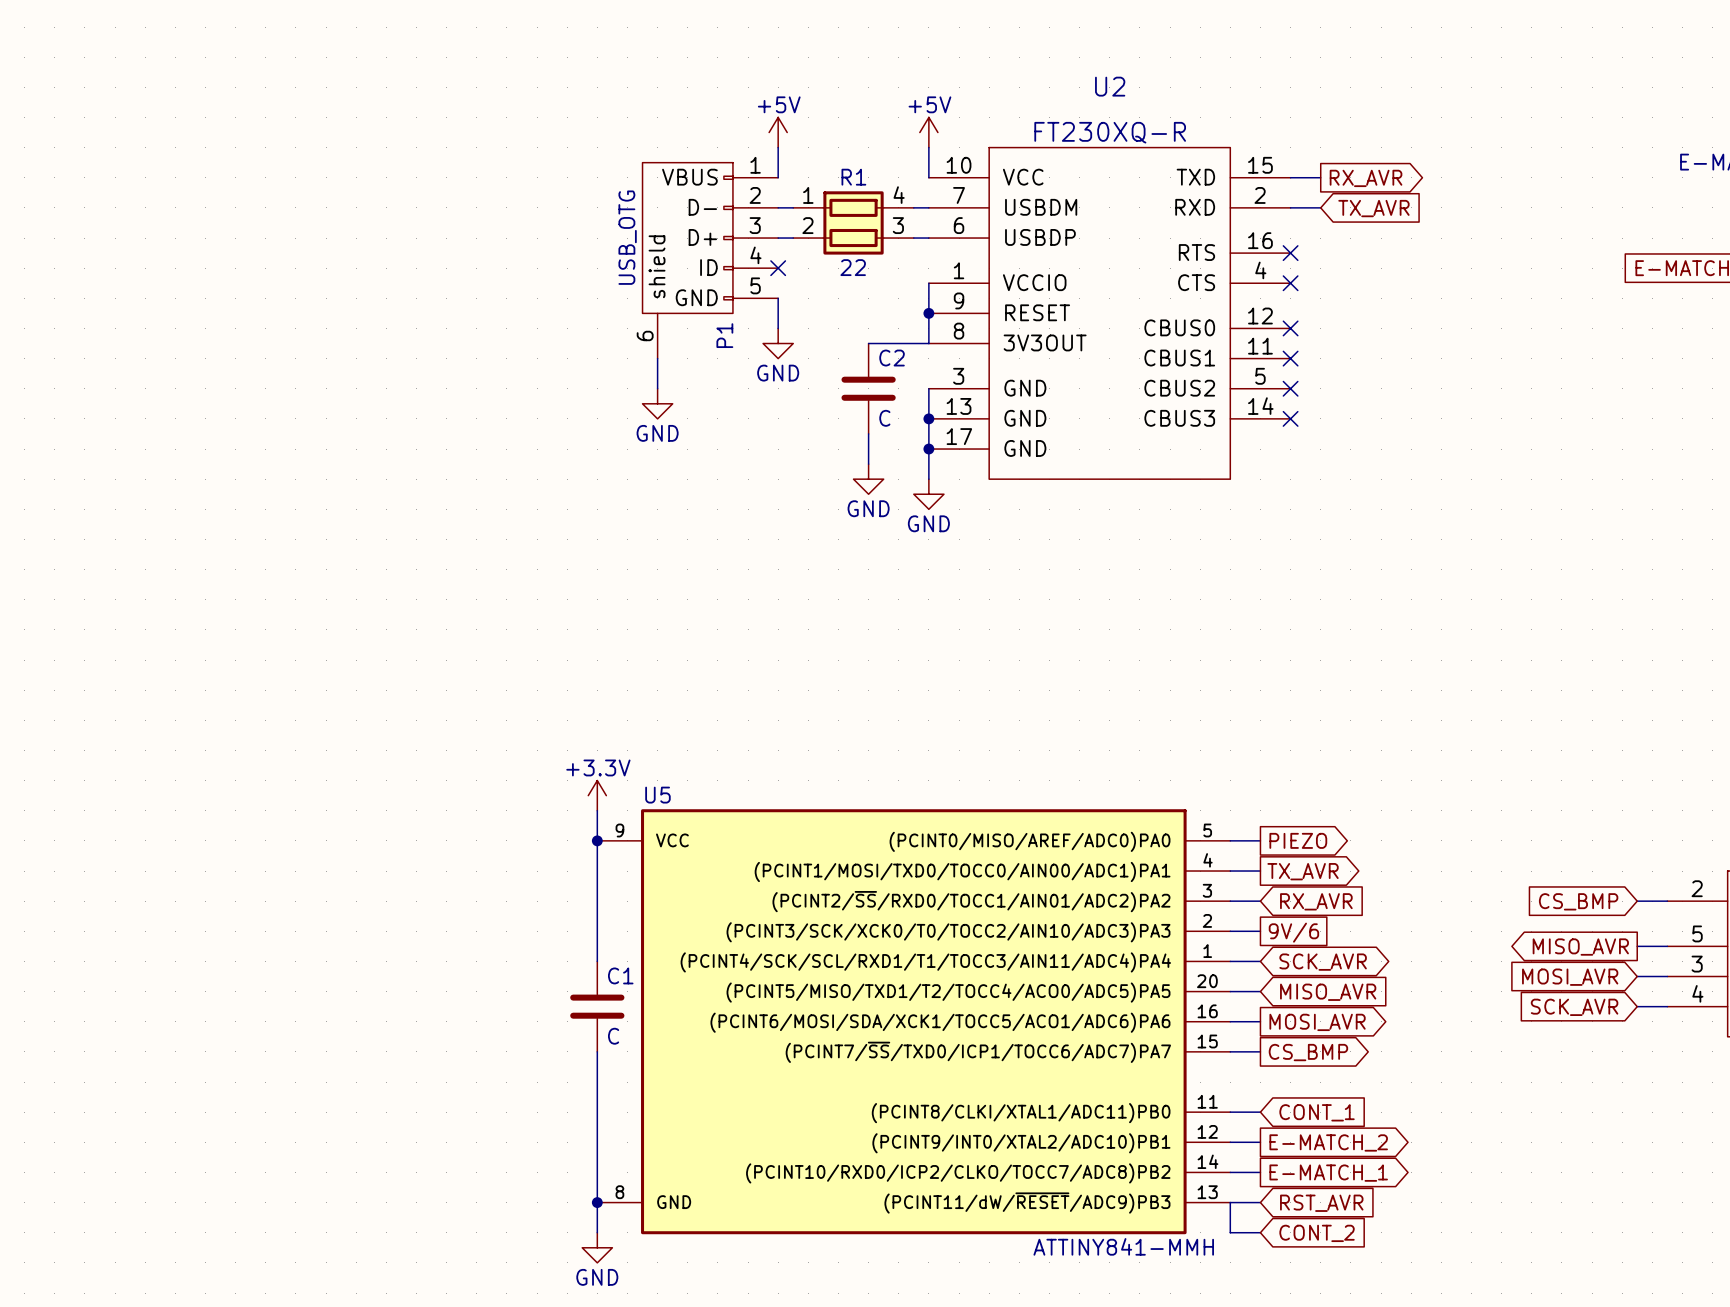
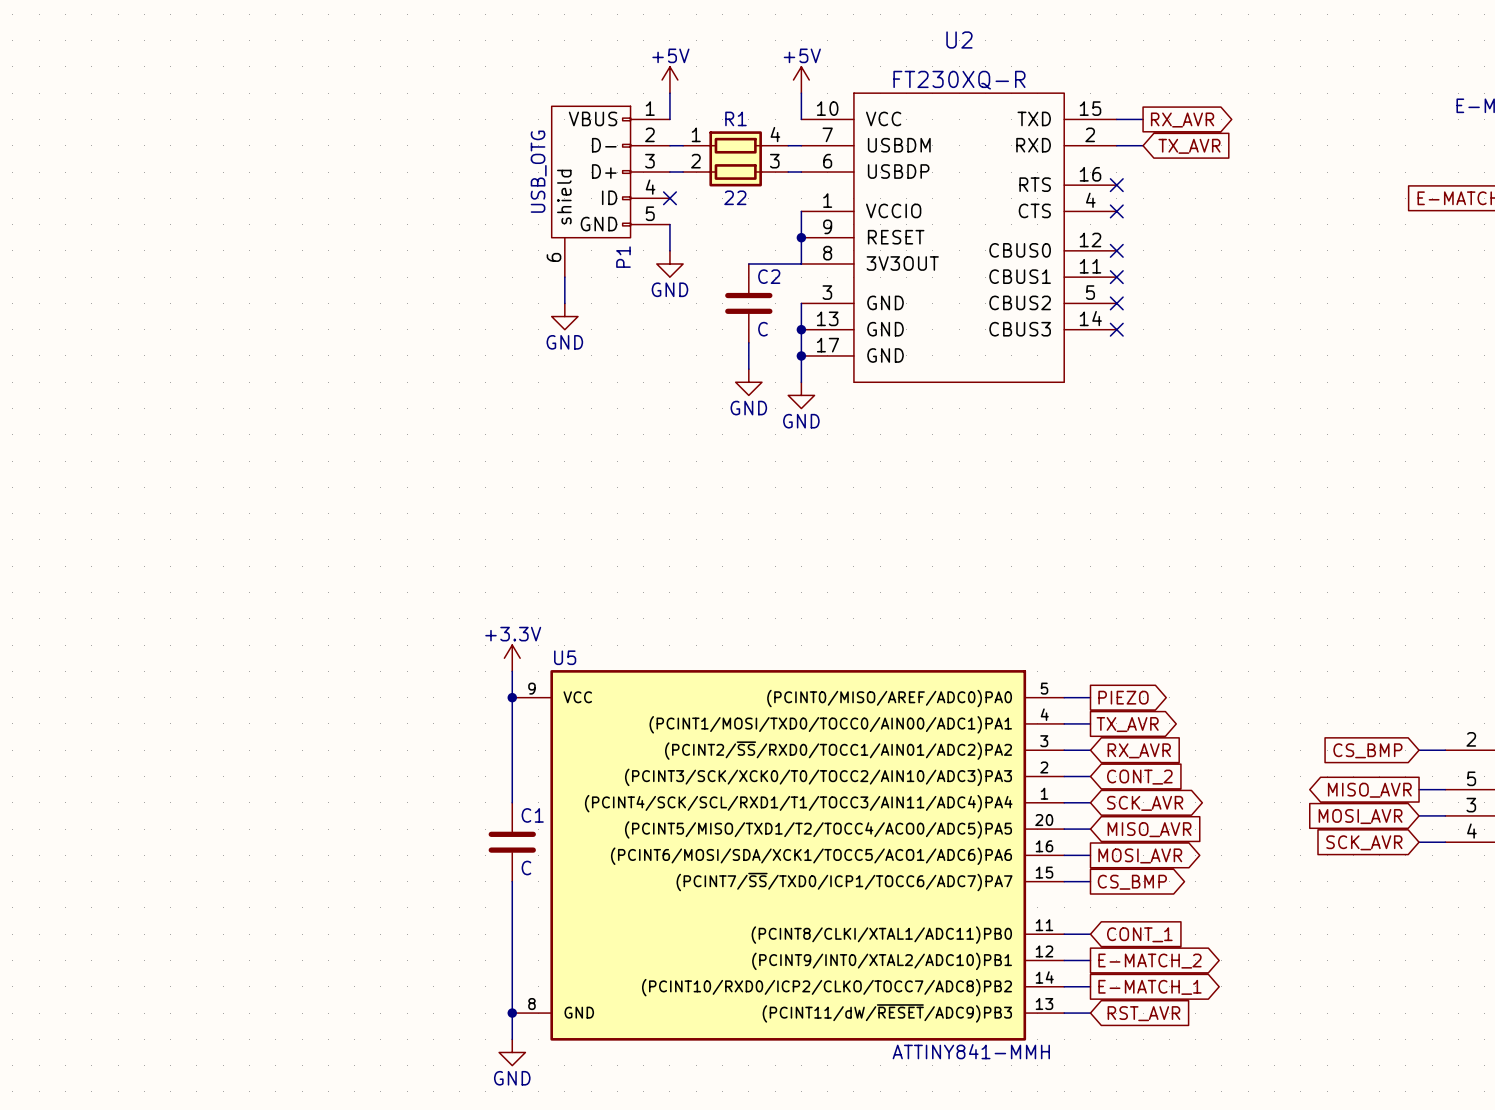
global label shape: passive (1293, 932) -> input (1139, 777)
global label: 9V/6 (1293, 932) -> CONT_2 (1139, 777)
wire: (1230, 1202) (1230, 1232) (1260, 1232) -> none
global label: CONT_2 (1317, 1233) -> none

